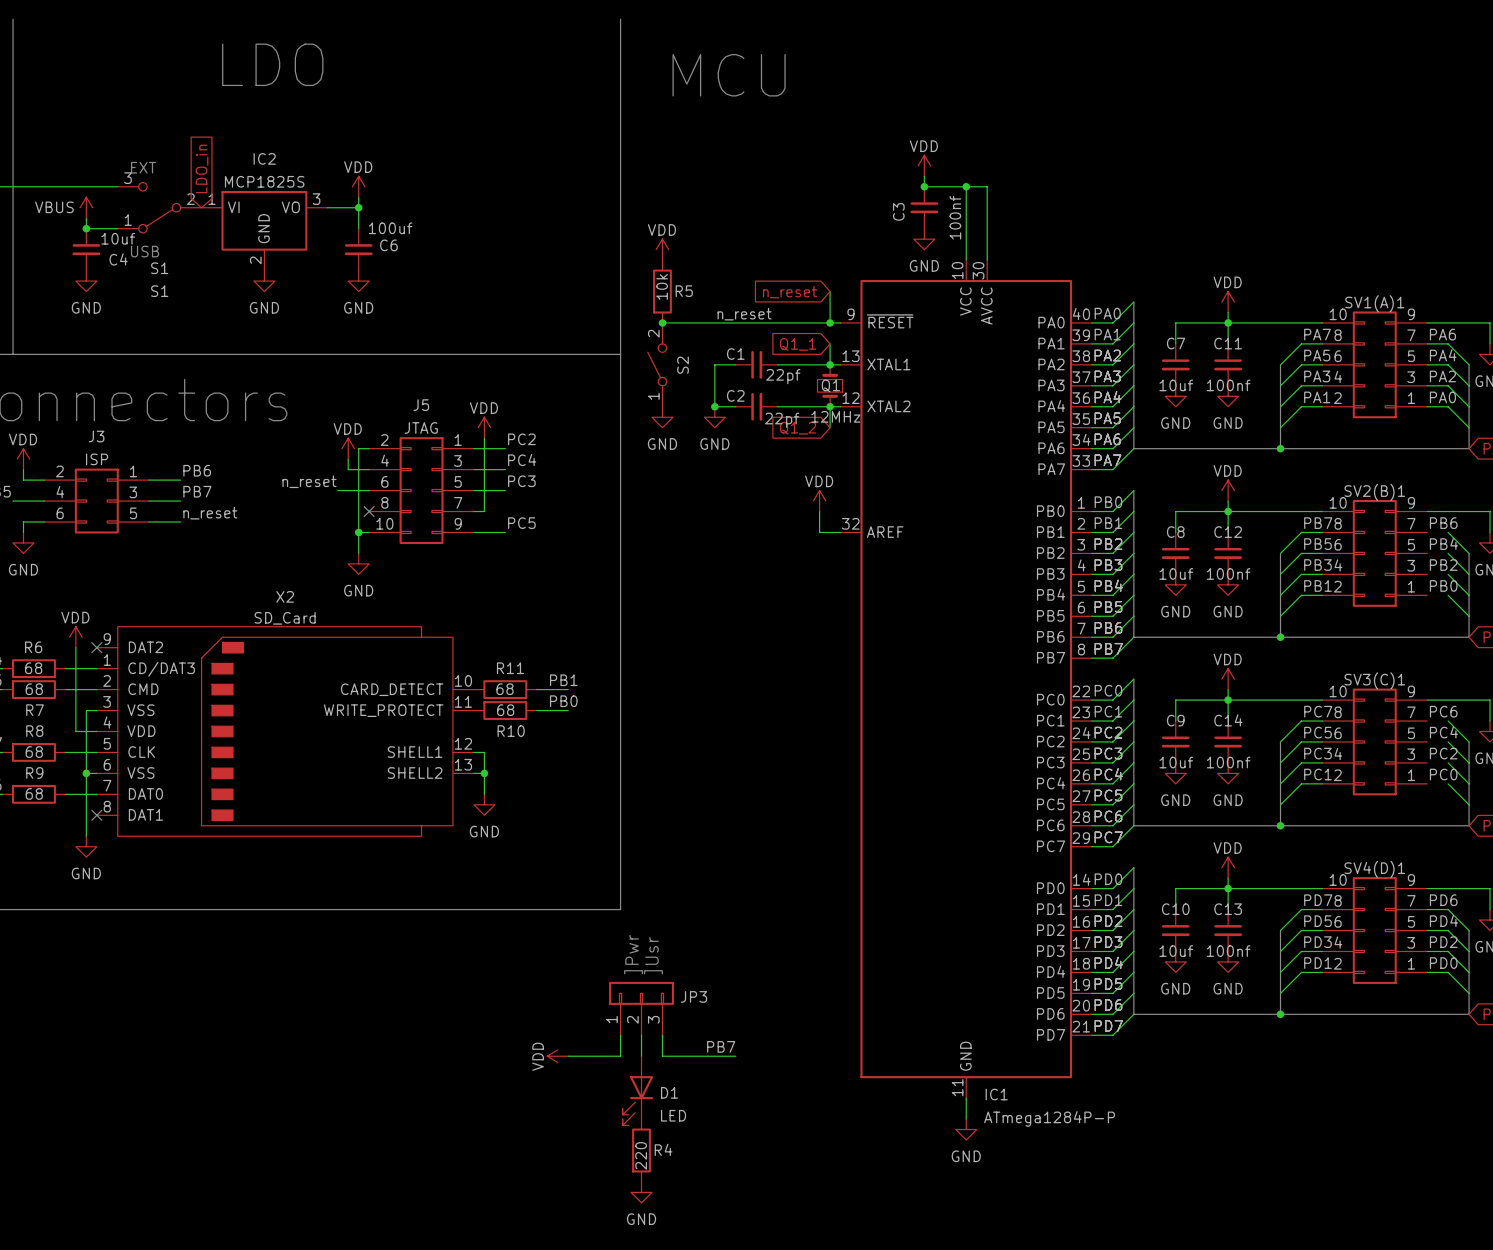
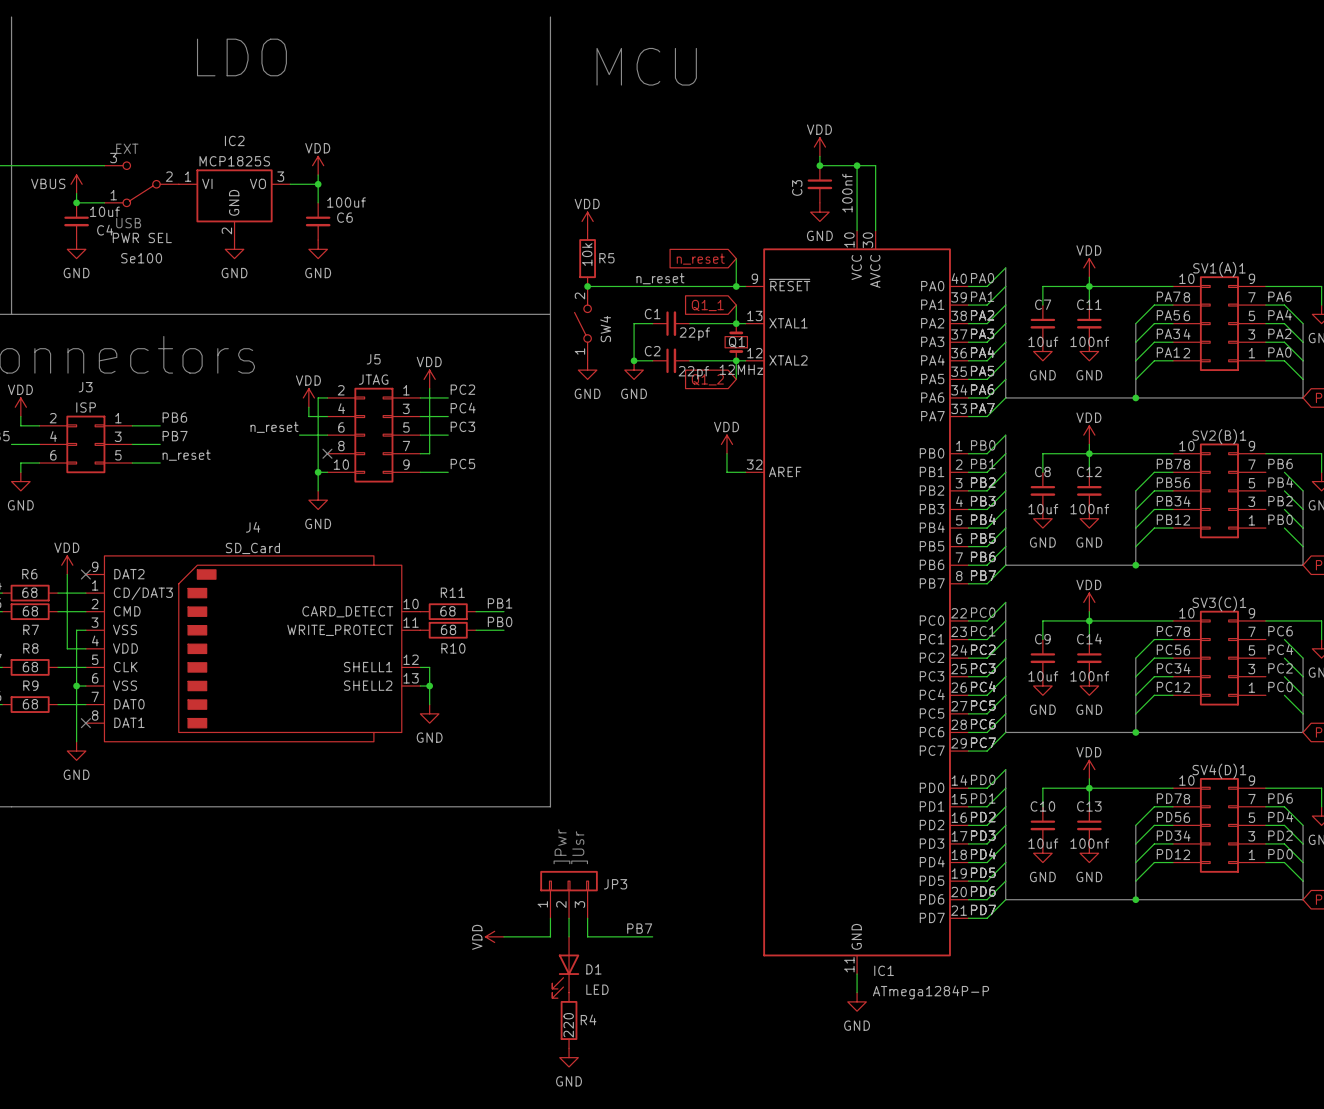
global label: LDO_in (202, 168) -> none
S1 value: S1 (159, 268) -> PWR SEL (142, 237)
S1 name: S1 (159, 291) -> Se100 (141, 258)
S2 name: S2 (683, 365) -> SW4 (605, 329)
X2 name: X2 (285, 596) -> J4 (253, 527)

